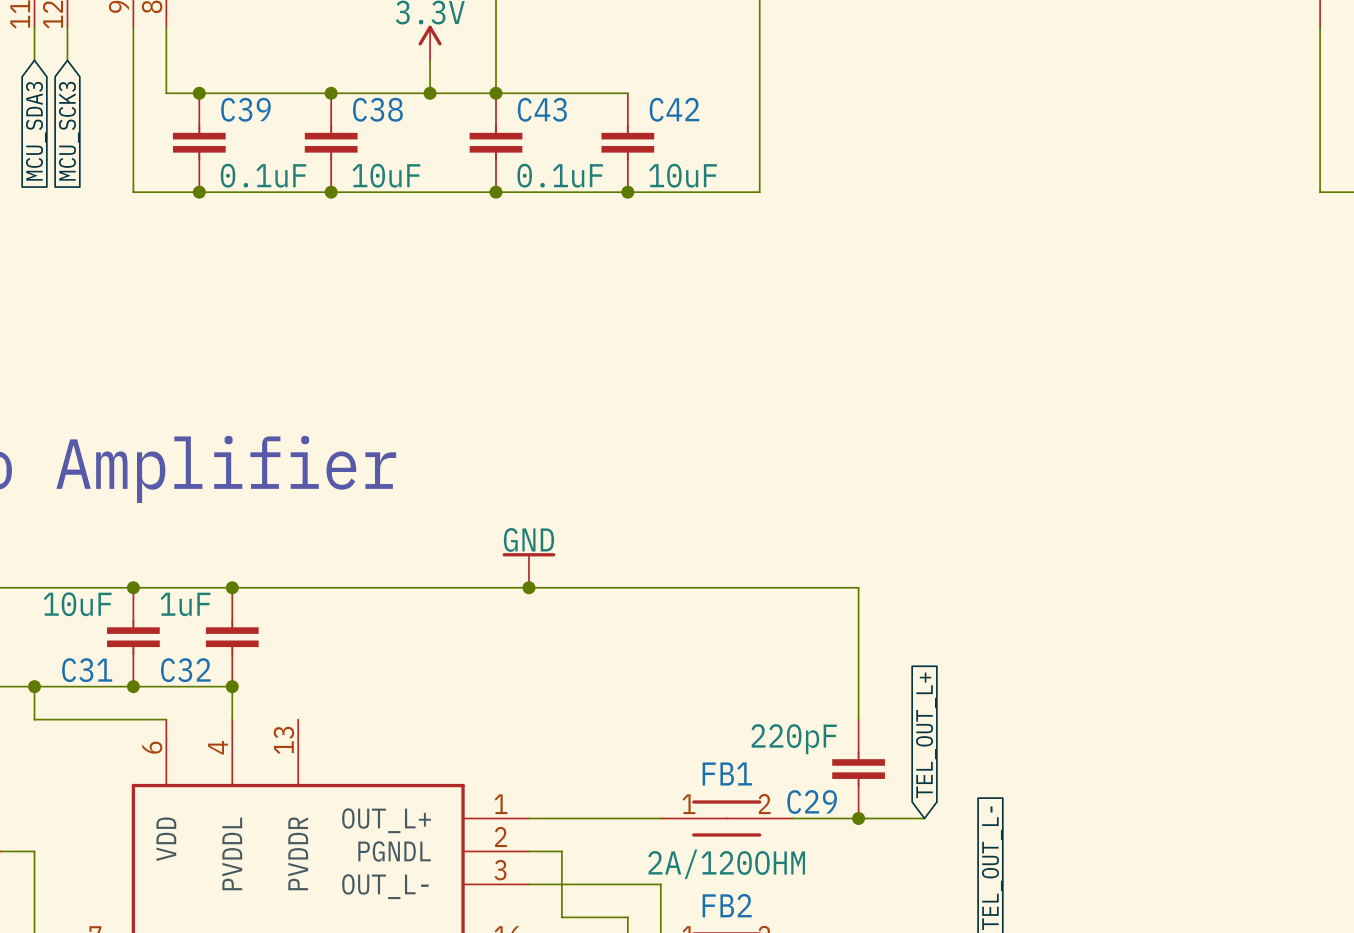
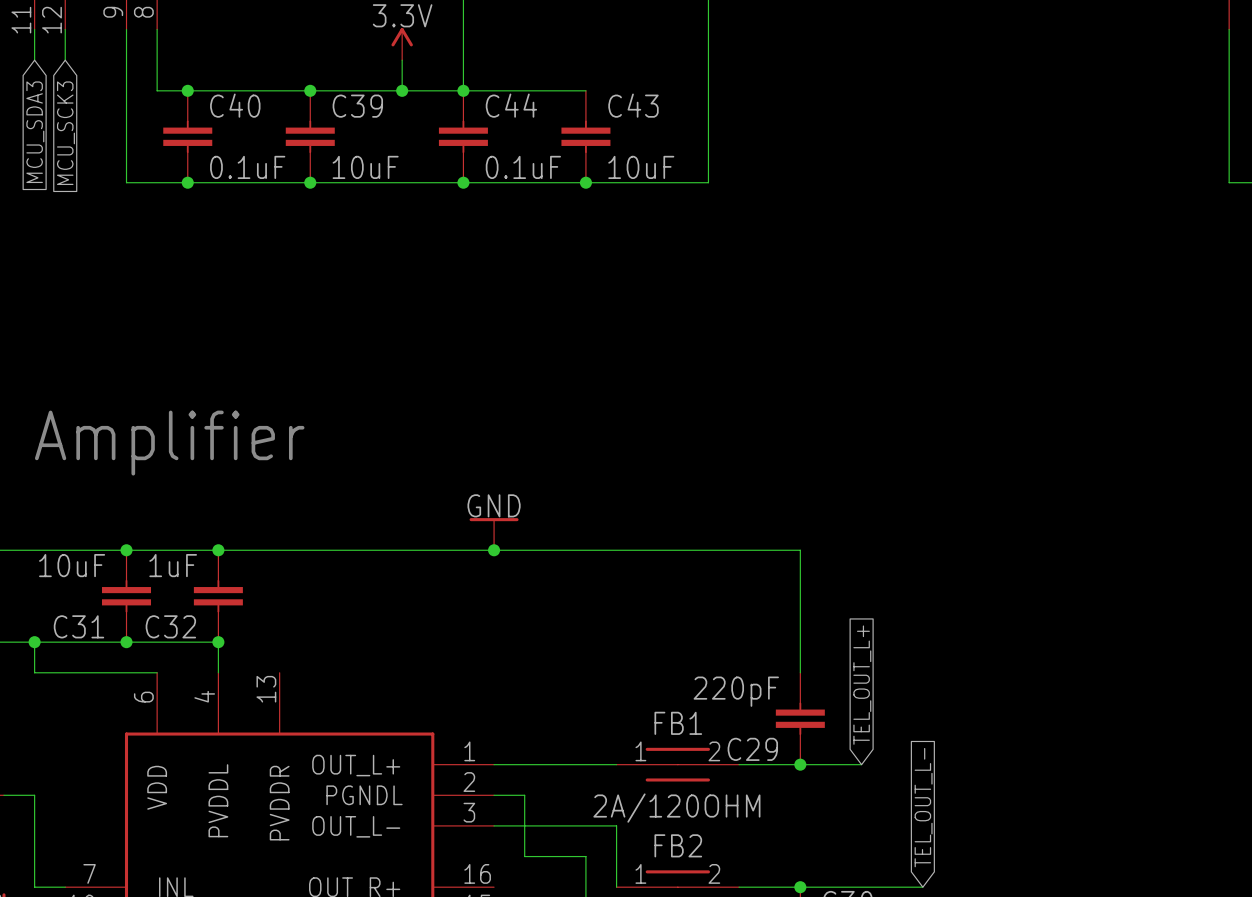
C39 name: C39 (245, 109) -> C40 (235, 105)
C38 name: C38 (377, 109) -> C39 (357, 106)
C43 name: C43 (542, 109) -> C44 (511, 105)
C42 name: C42 (674, 109) -> C43 (633, 105)

